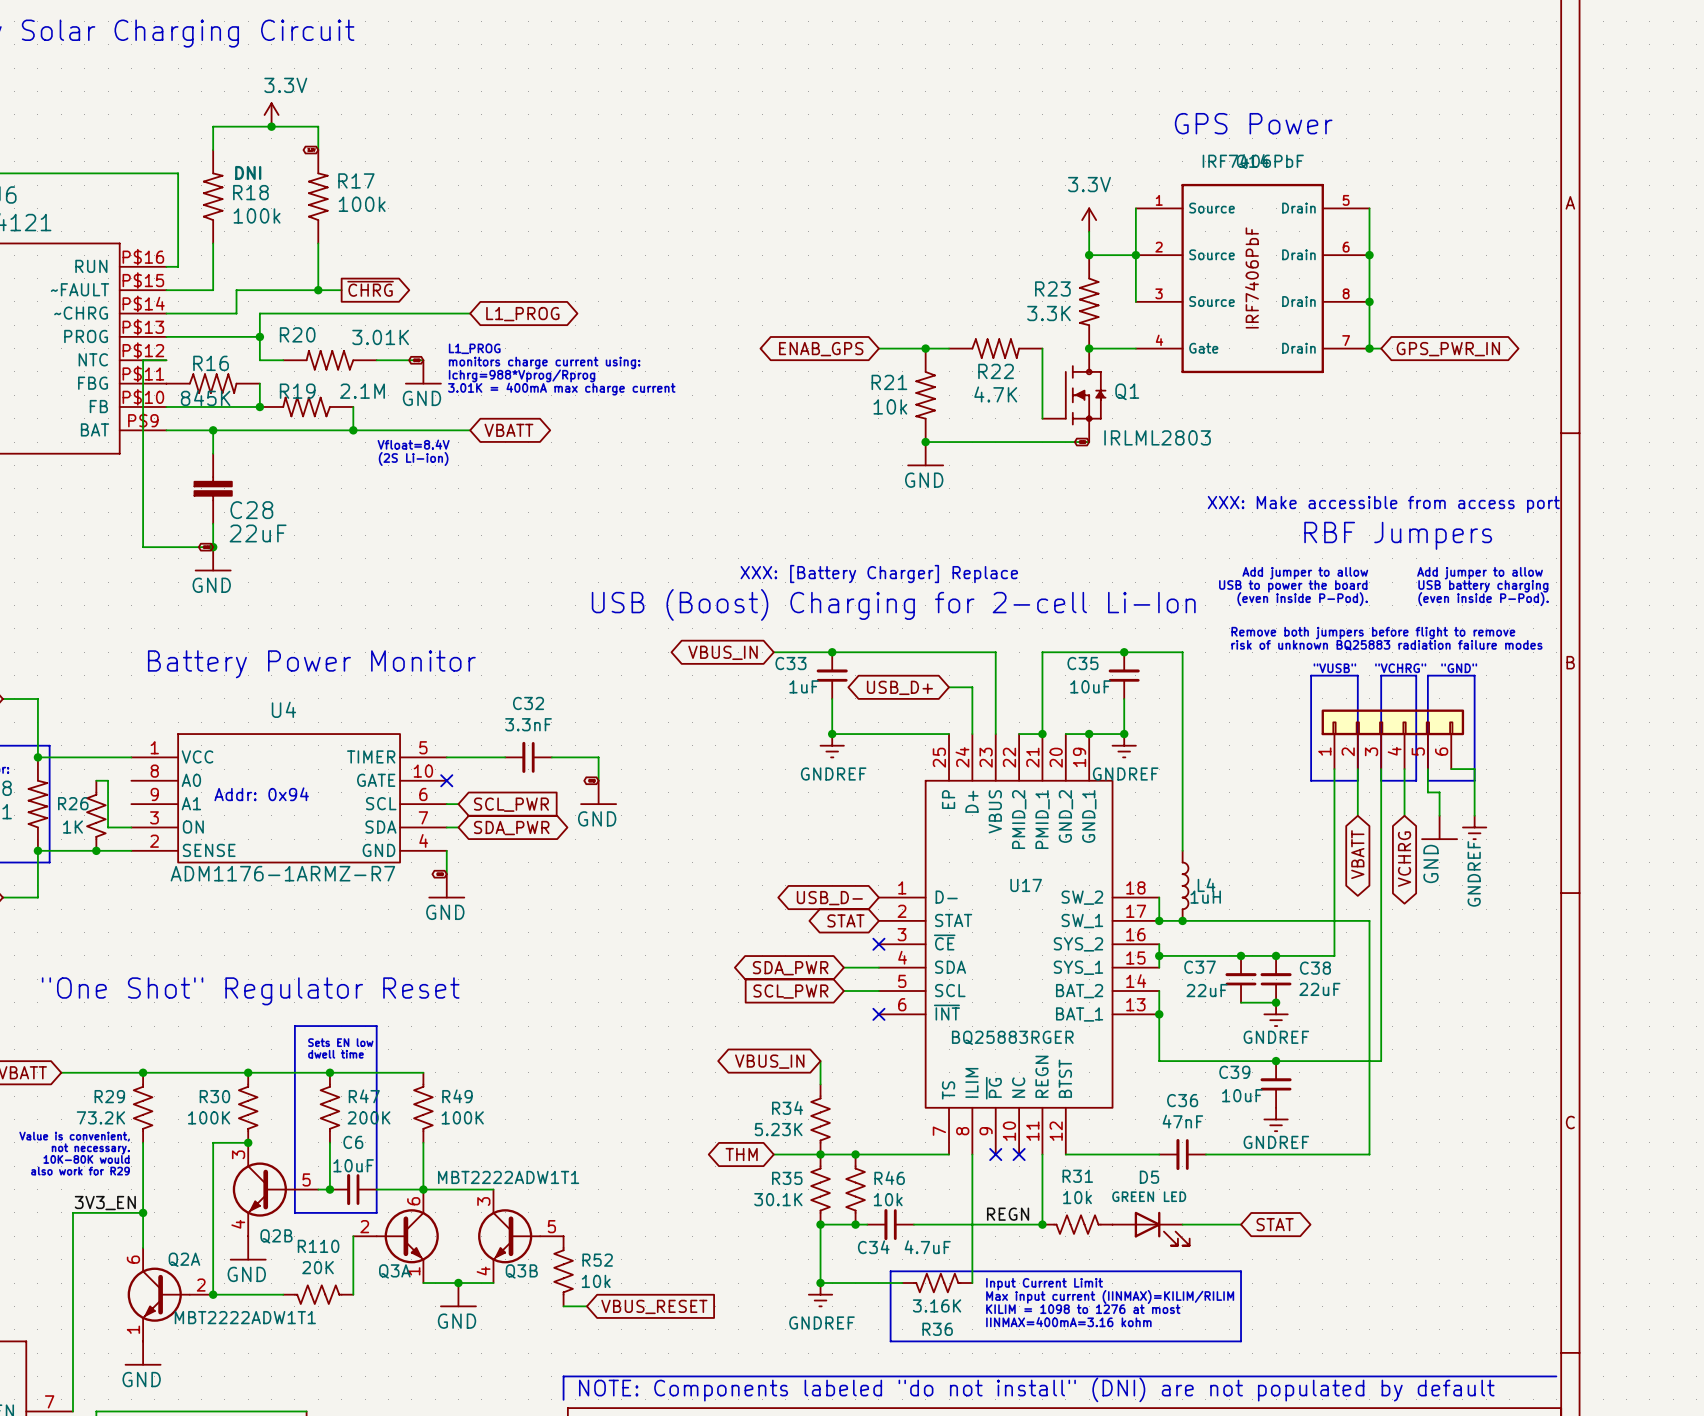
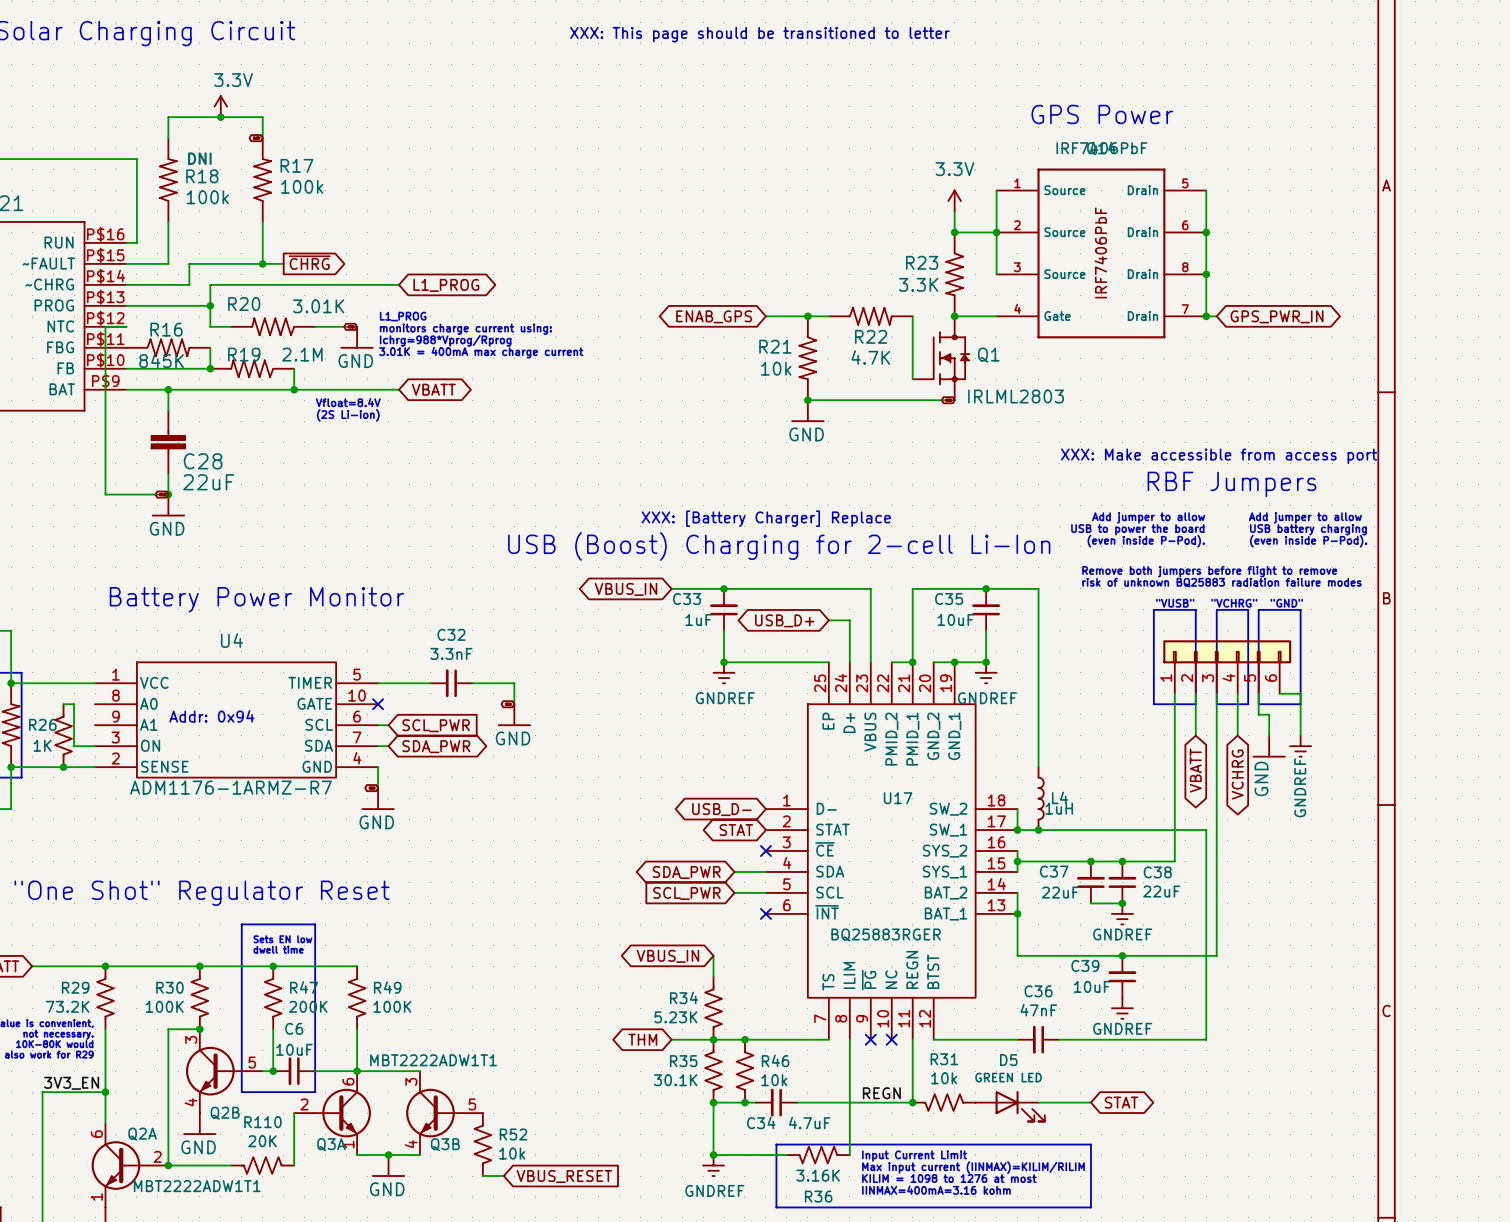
text: none -> XXX: This page should be transitioned to letter (759, 34)

